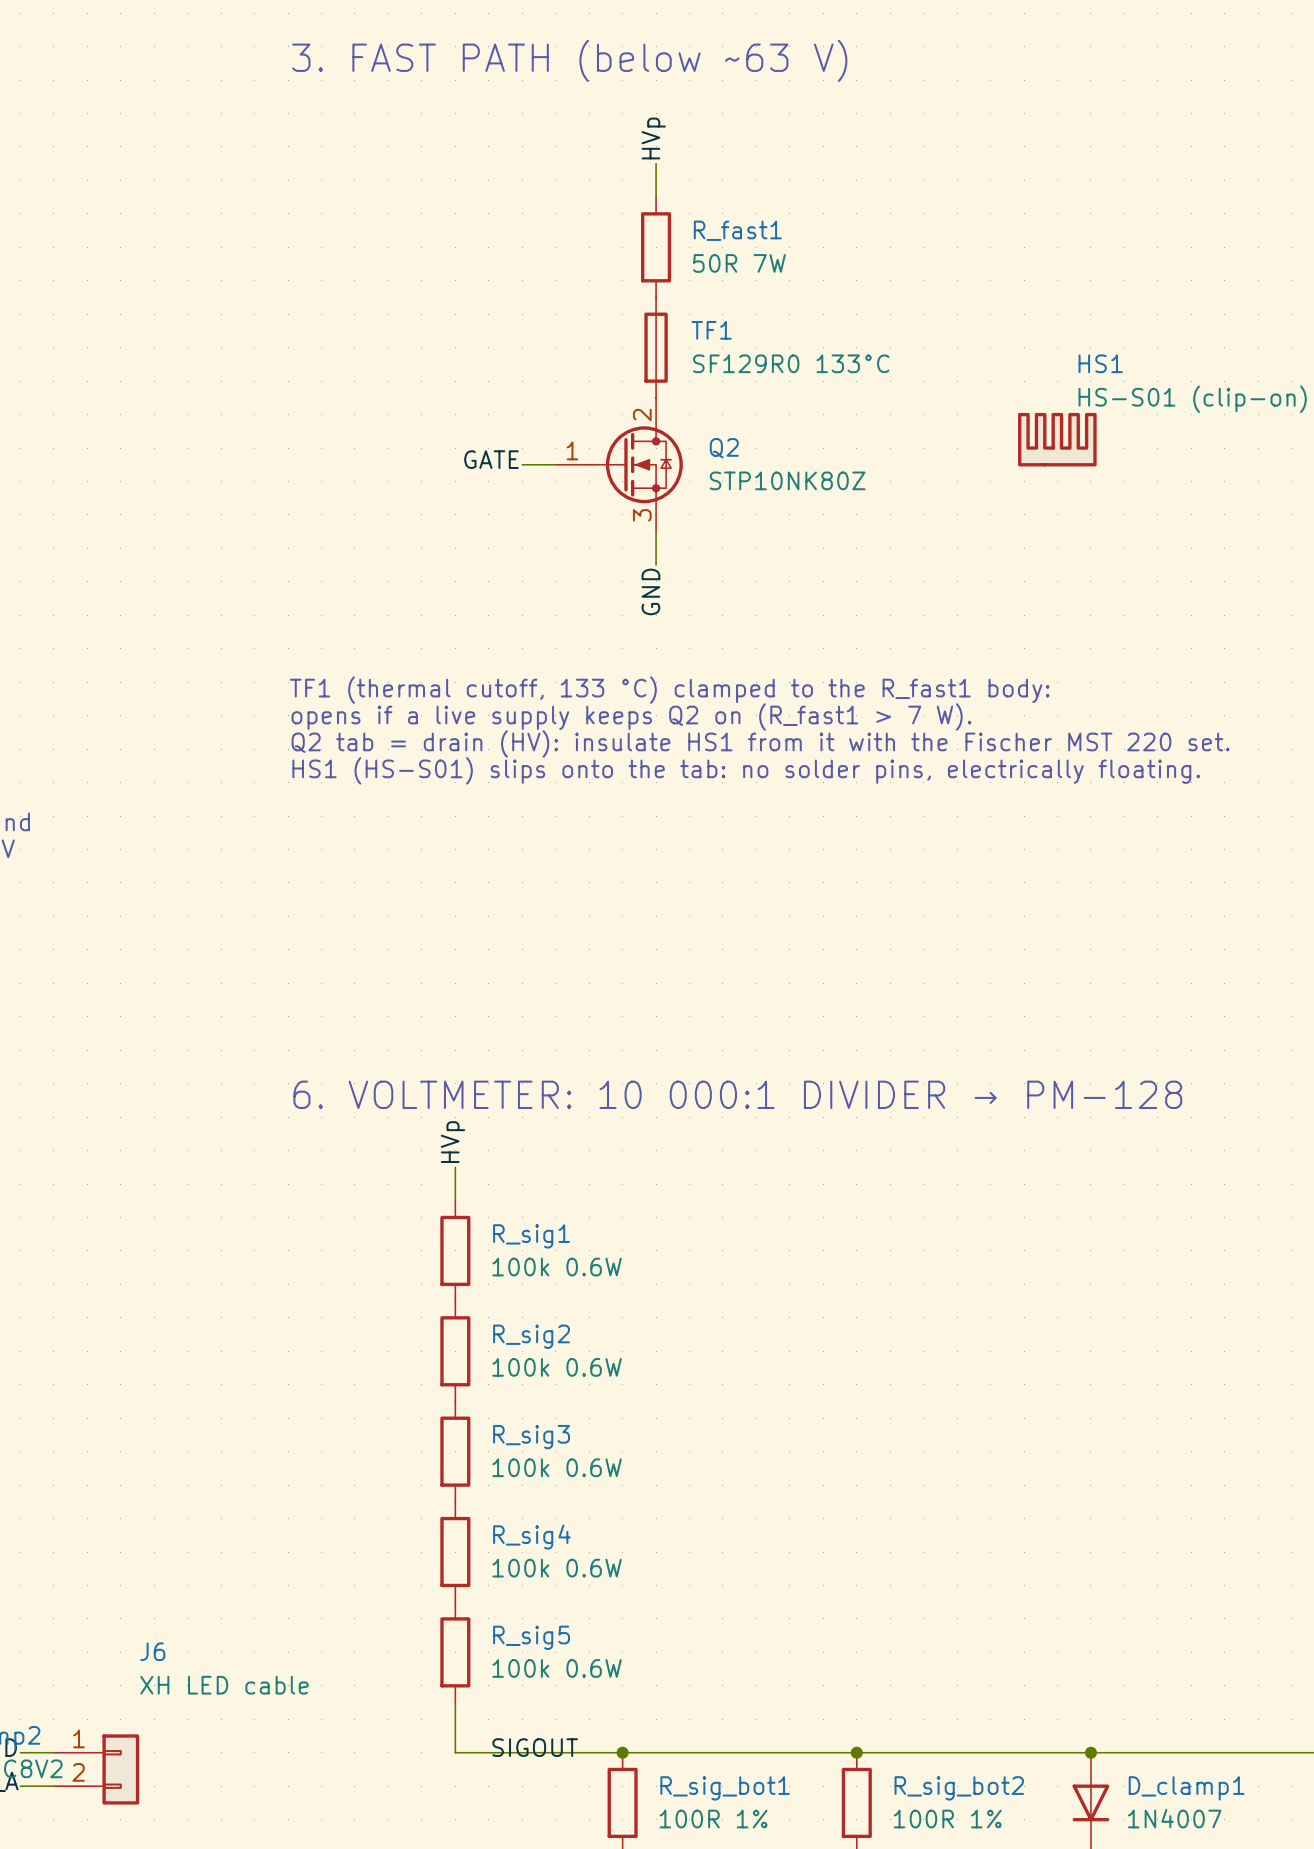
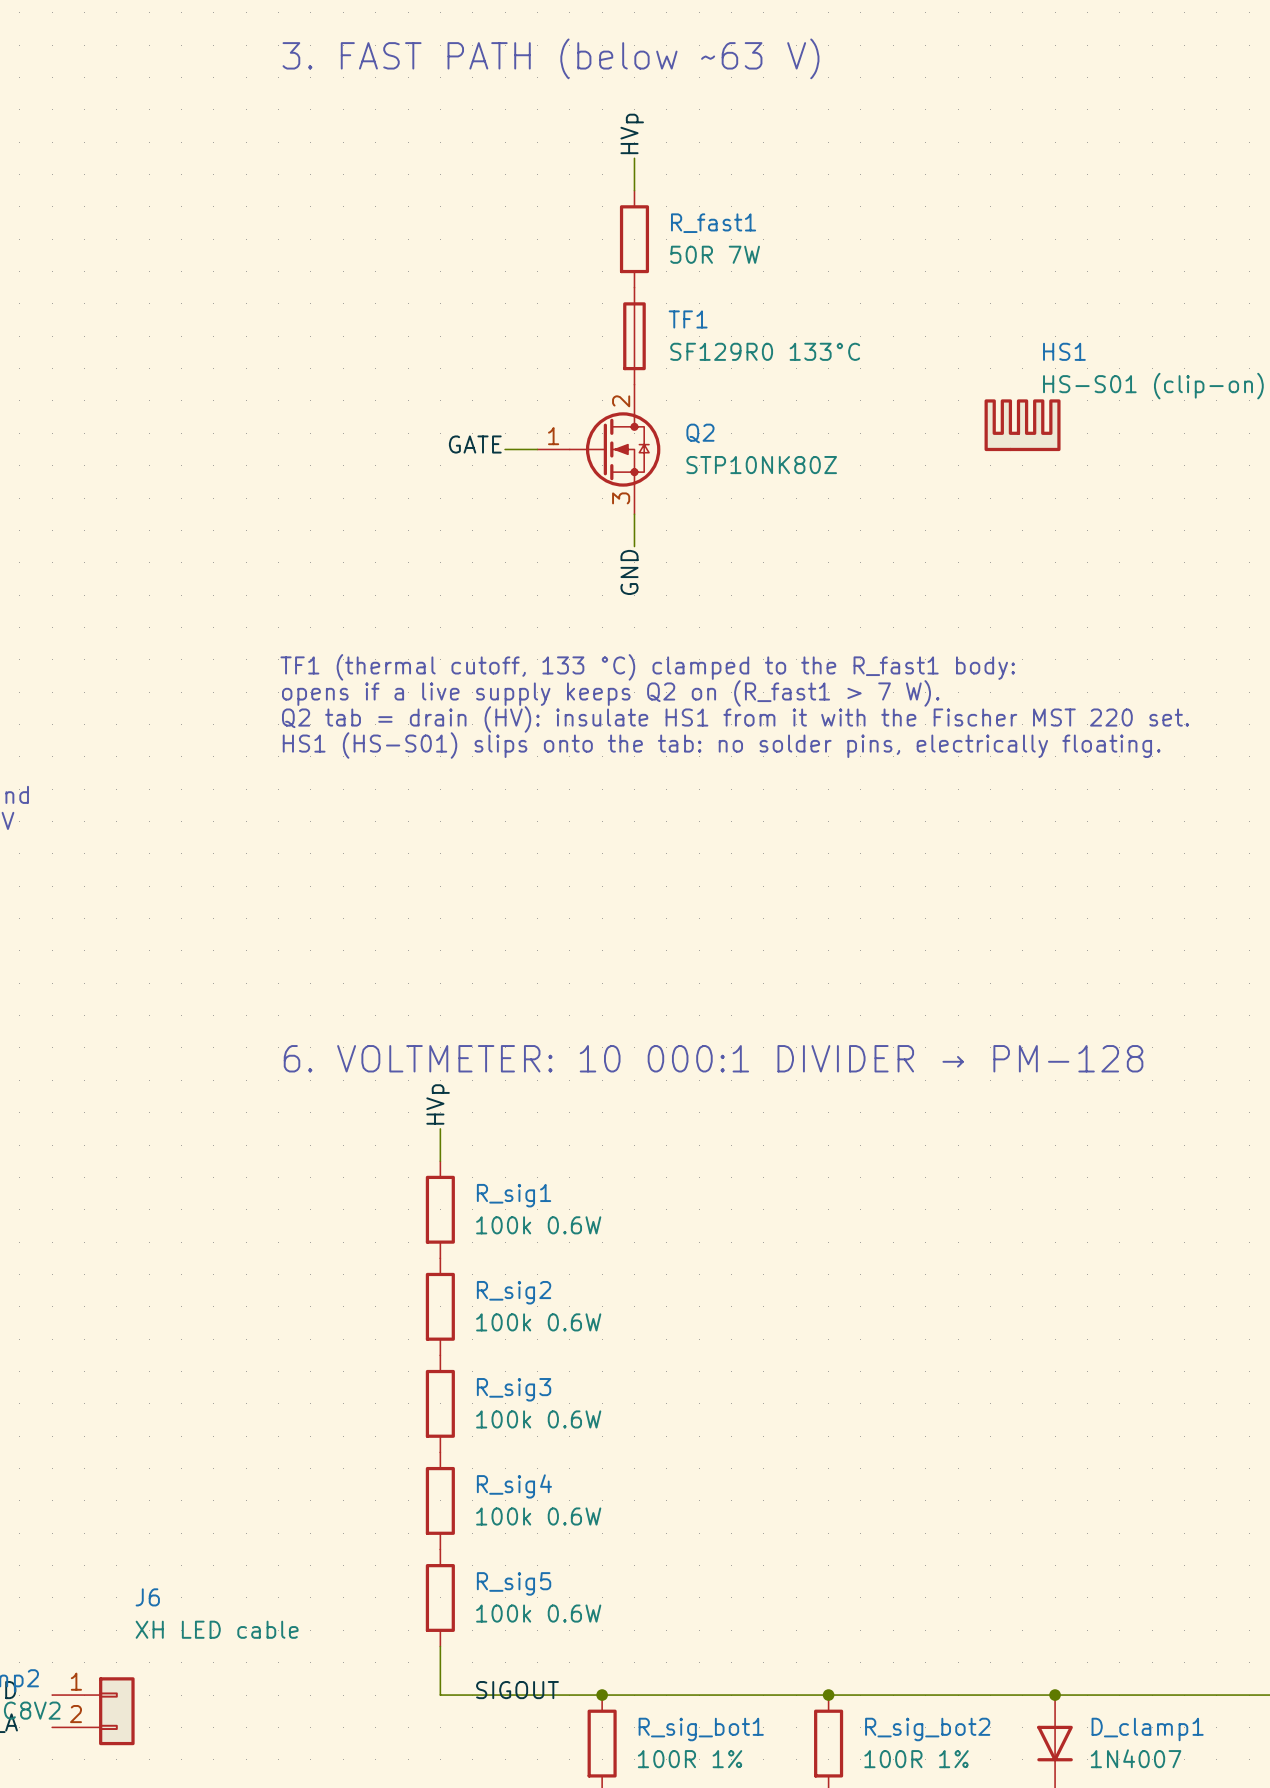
wire: (20, 1752) (53, 1752) -> none
wire: (20, 1786) (53, 1786) -> none

